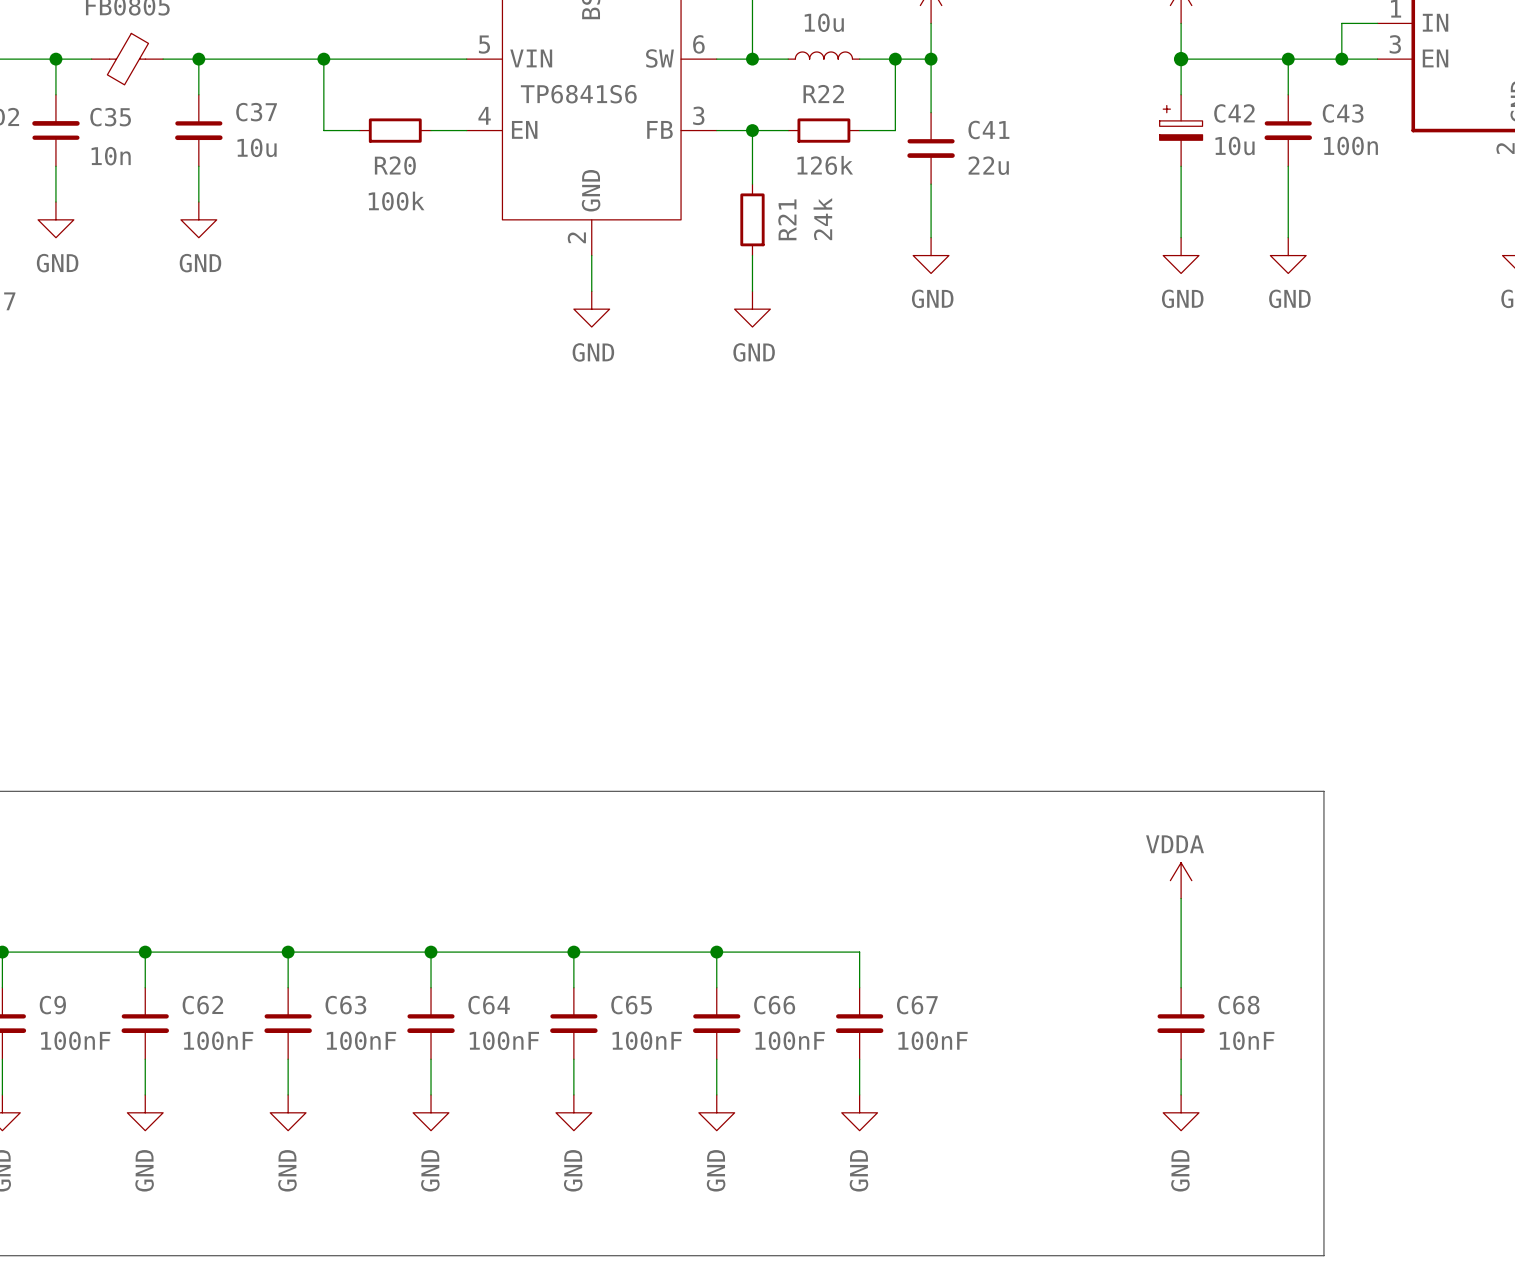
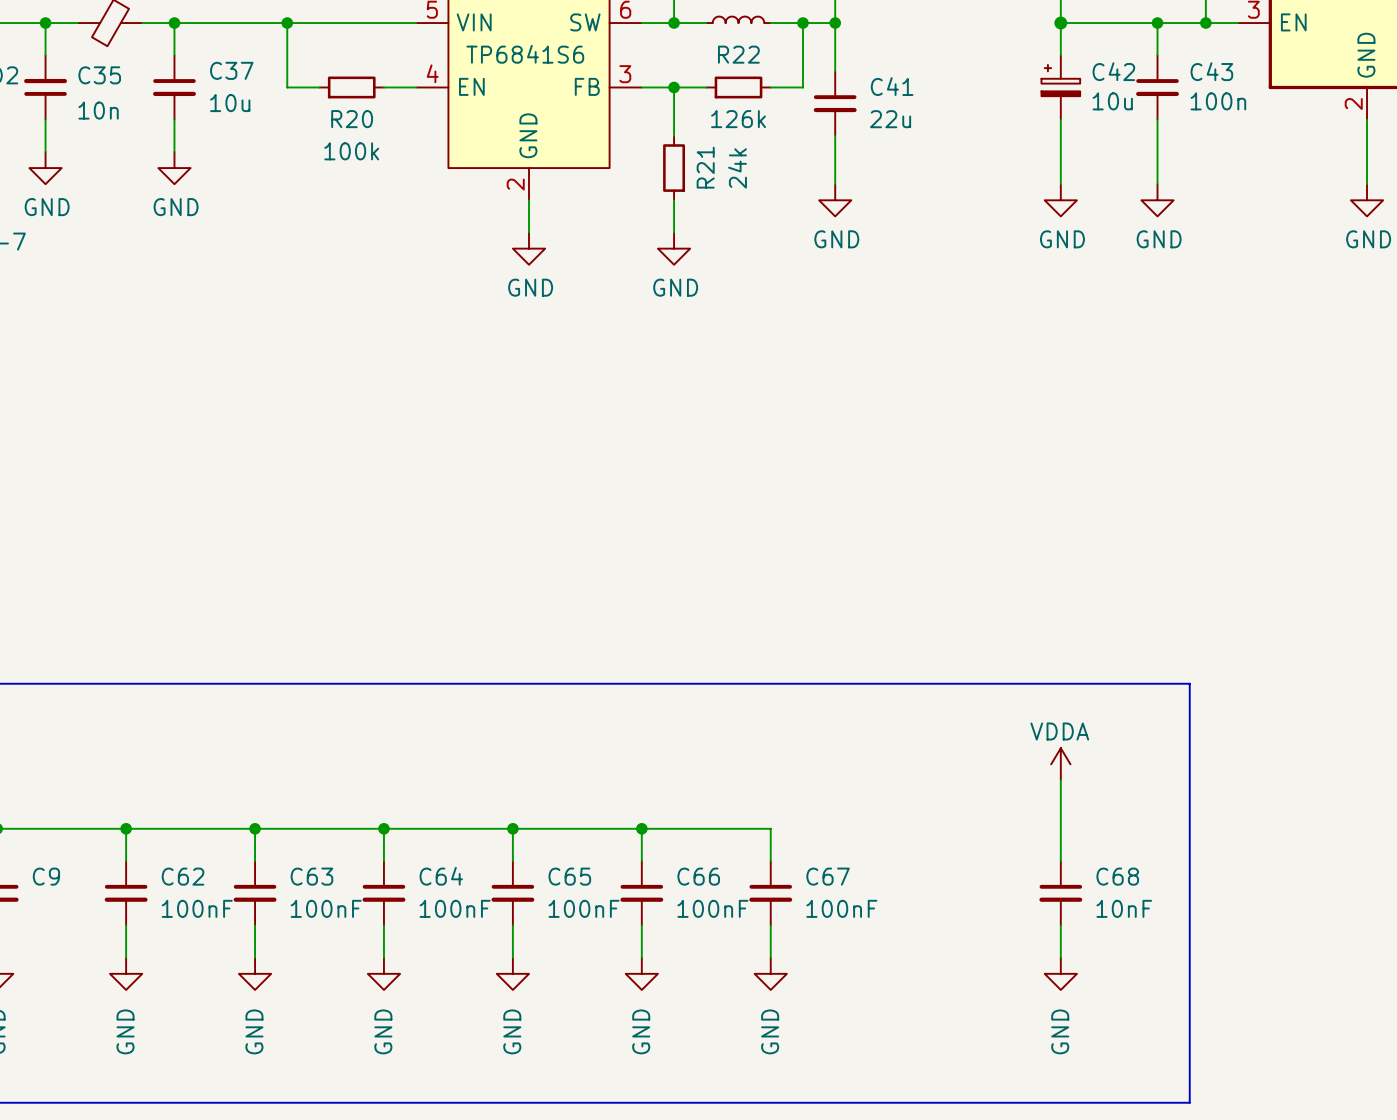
C9 value: 100nF (75, 1040) -> none

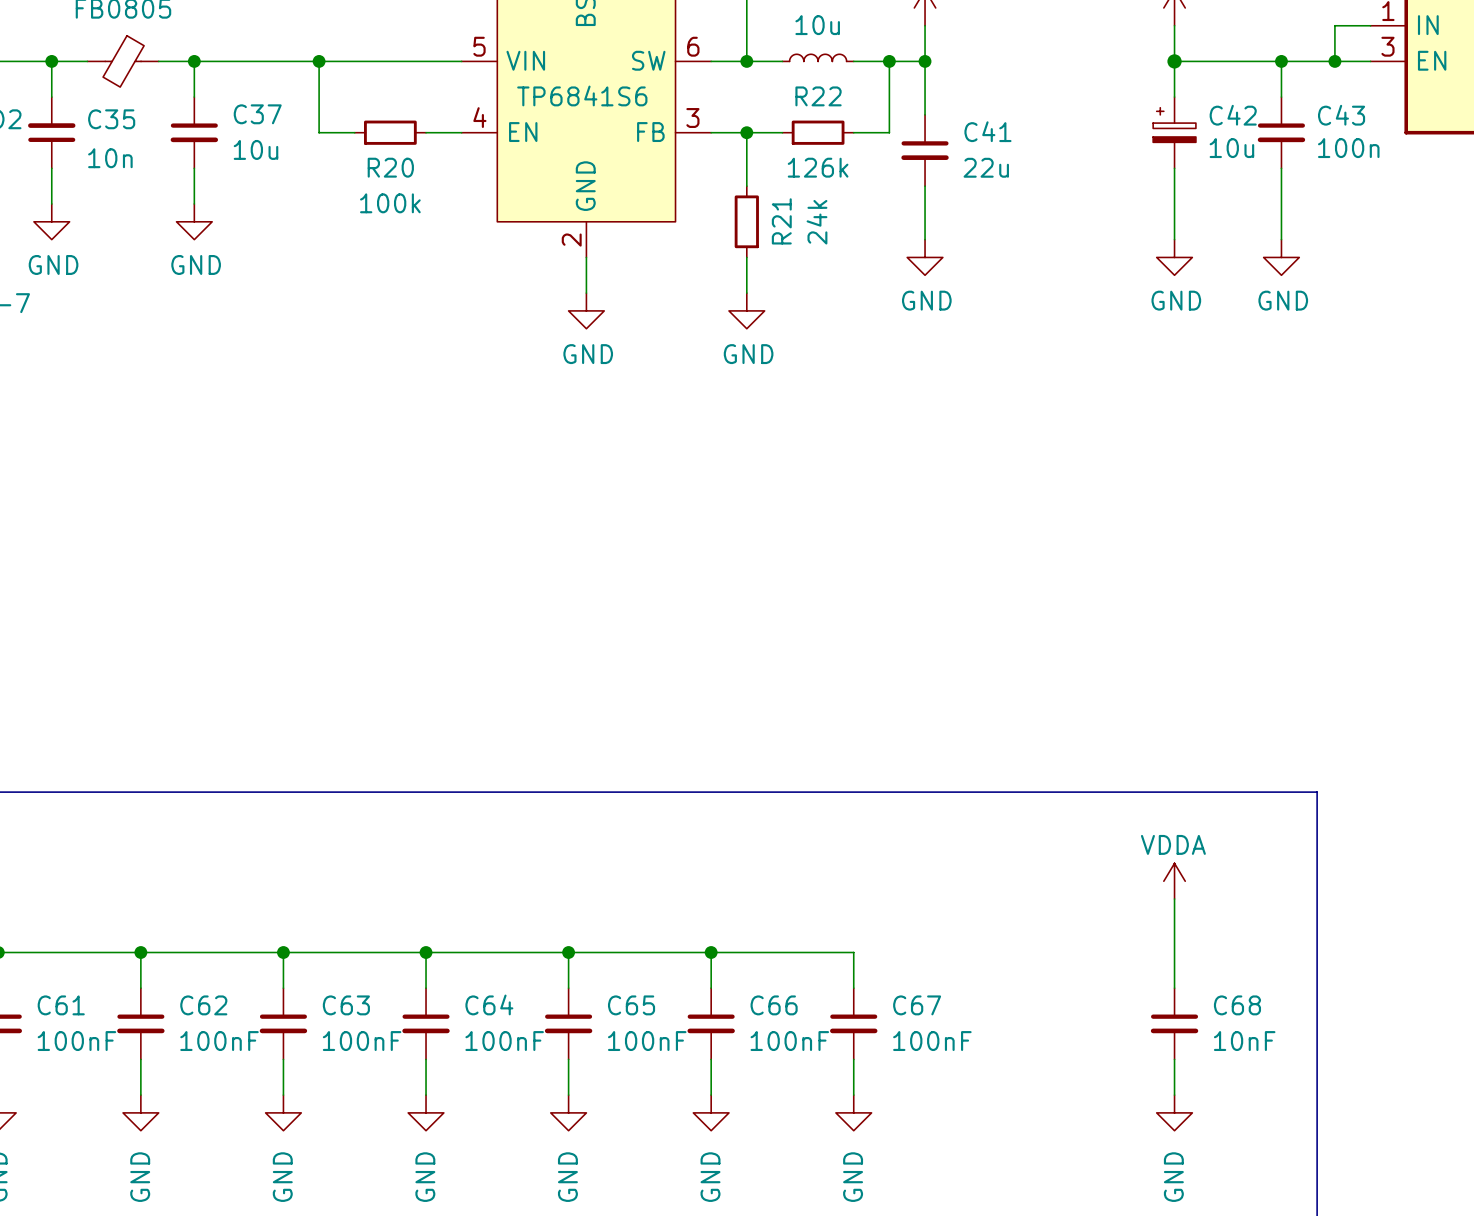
C9 name: C9 (46, 876) -> C61 (61, 1005)
C9 value: none -> 100nF (76, 1041)

